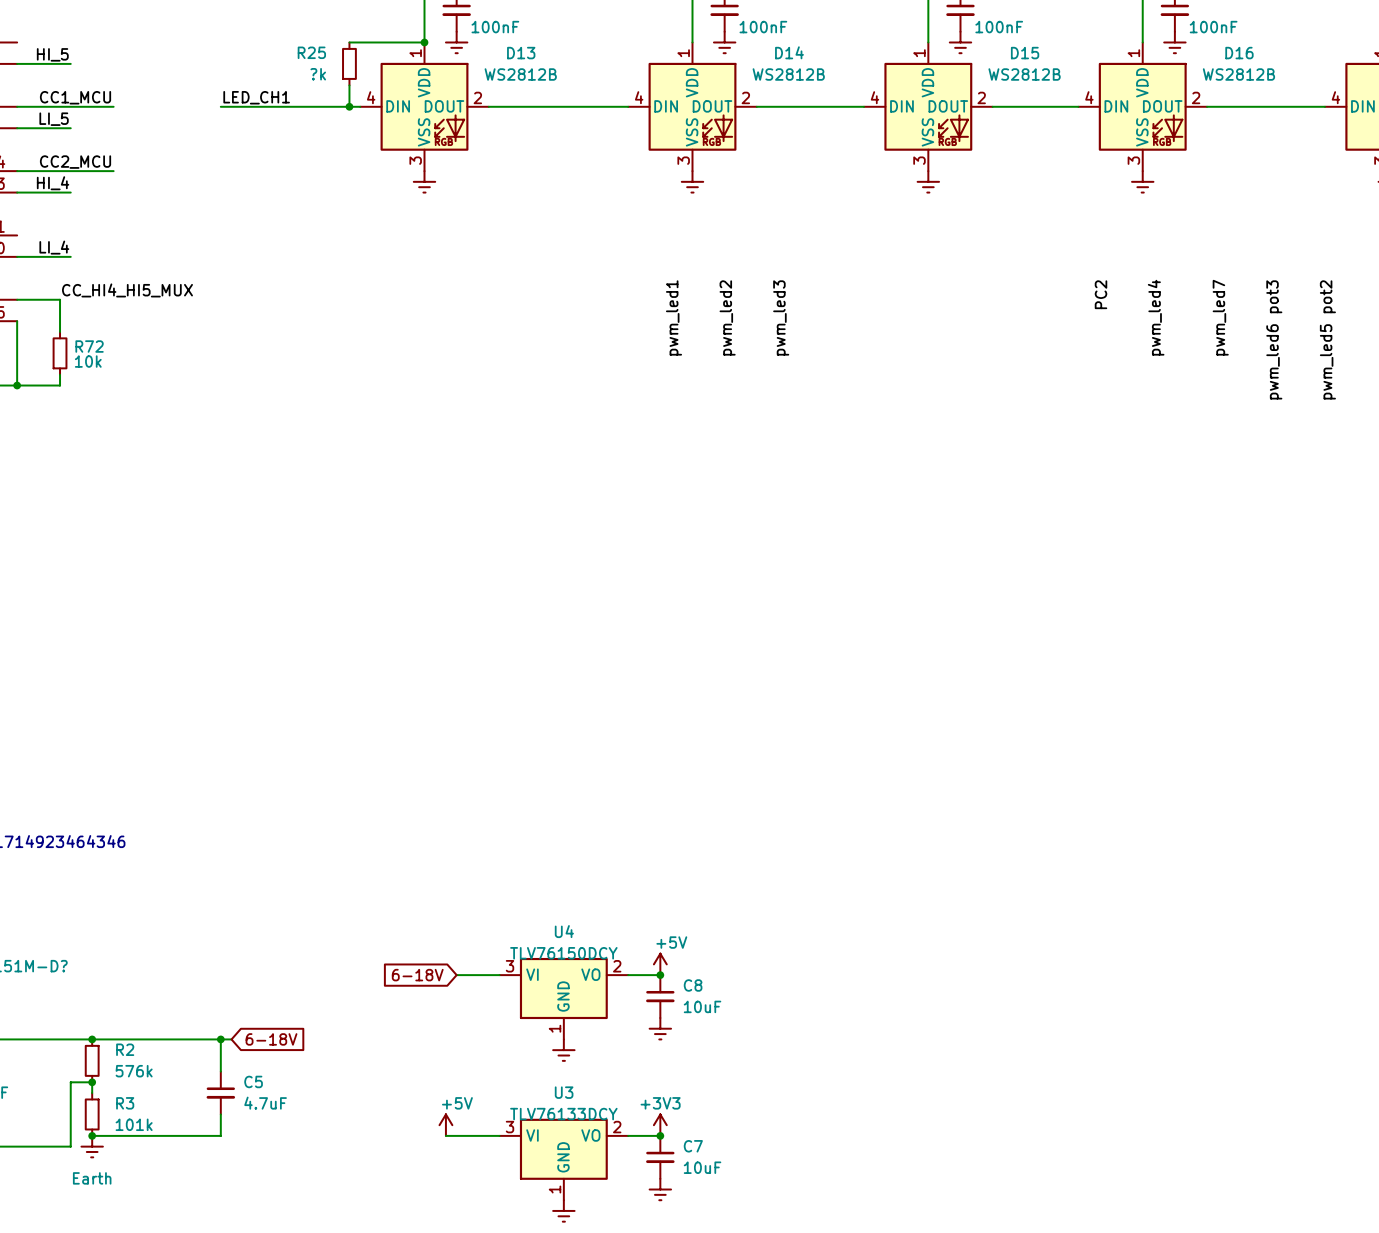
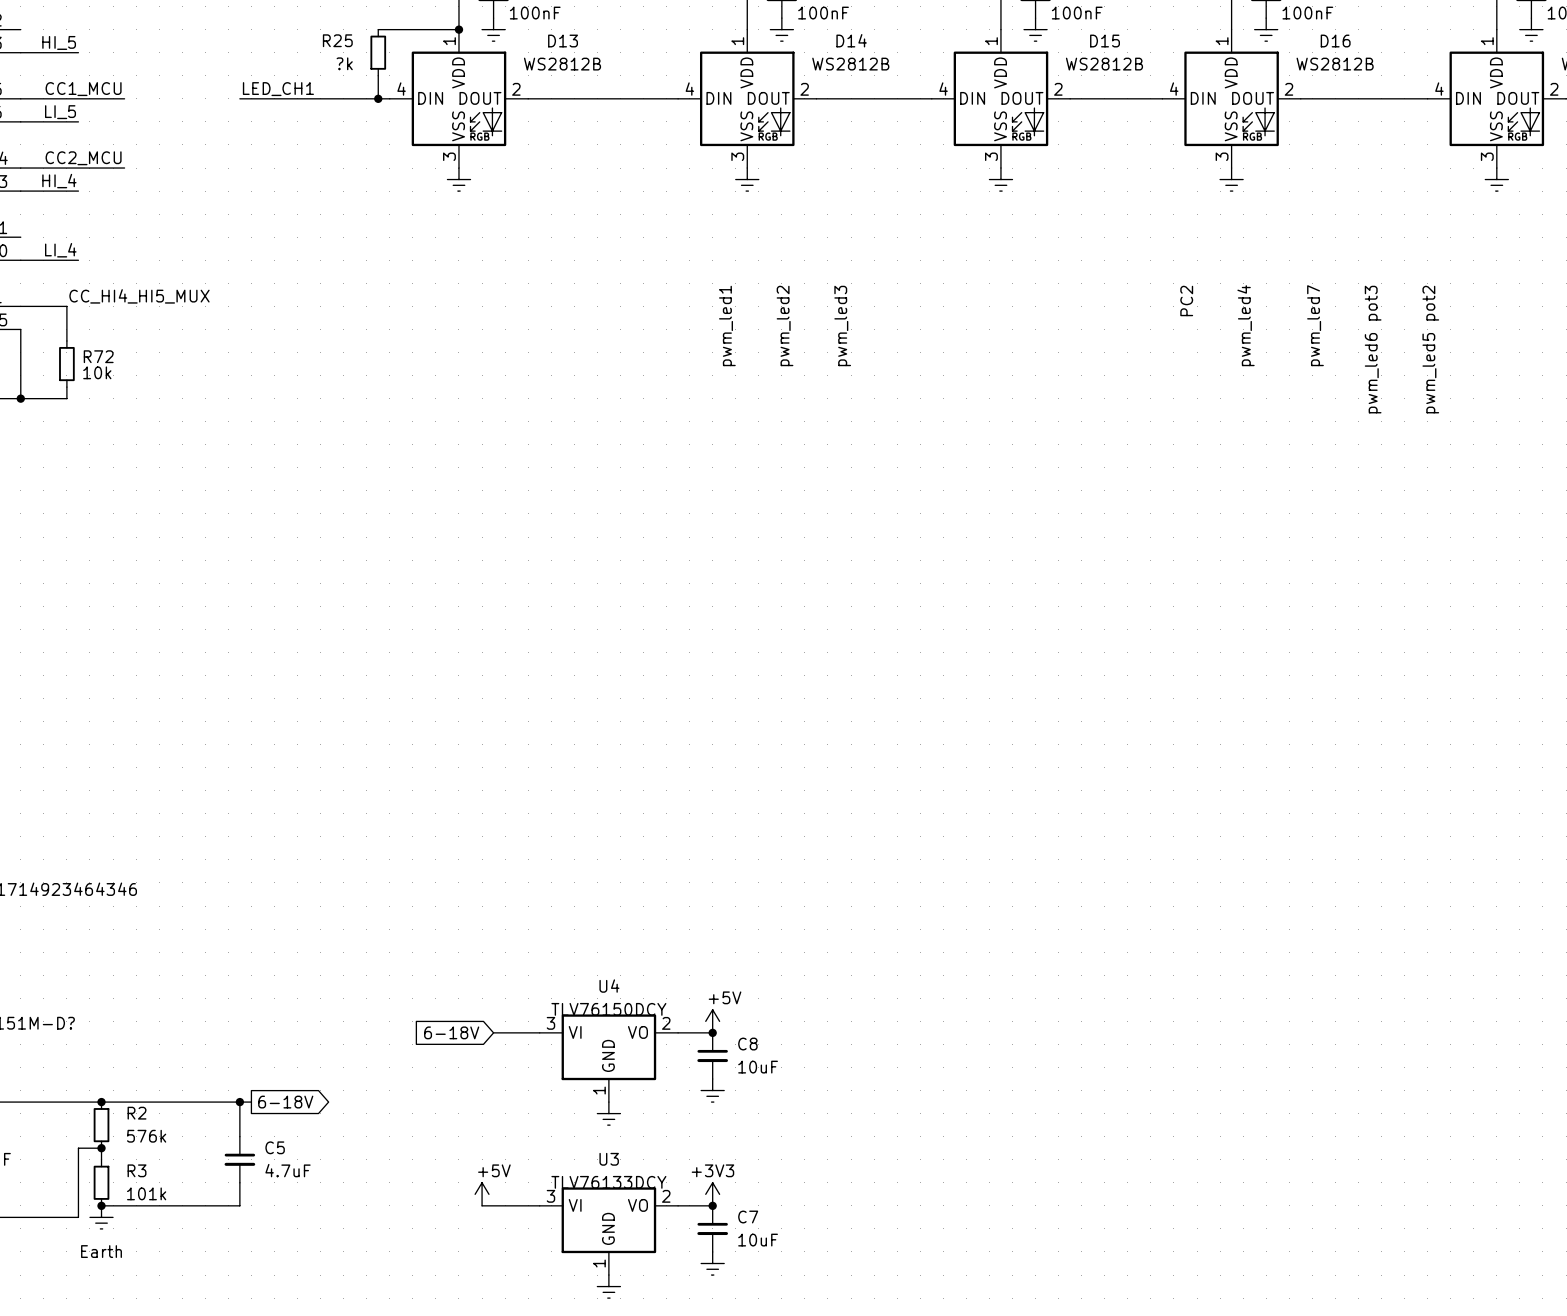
global label shape: input (271, 1039) -> output (285, 1102)

